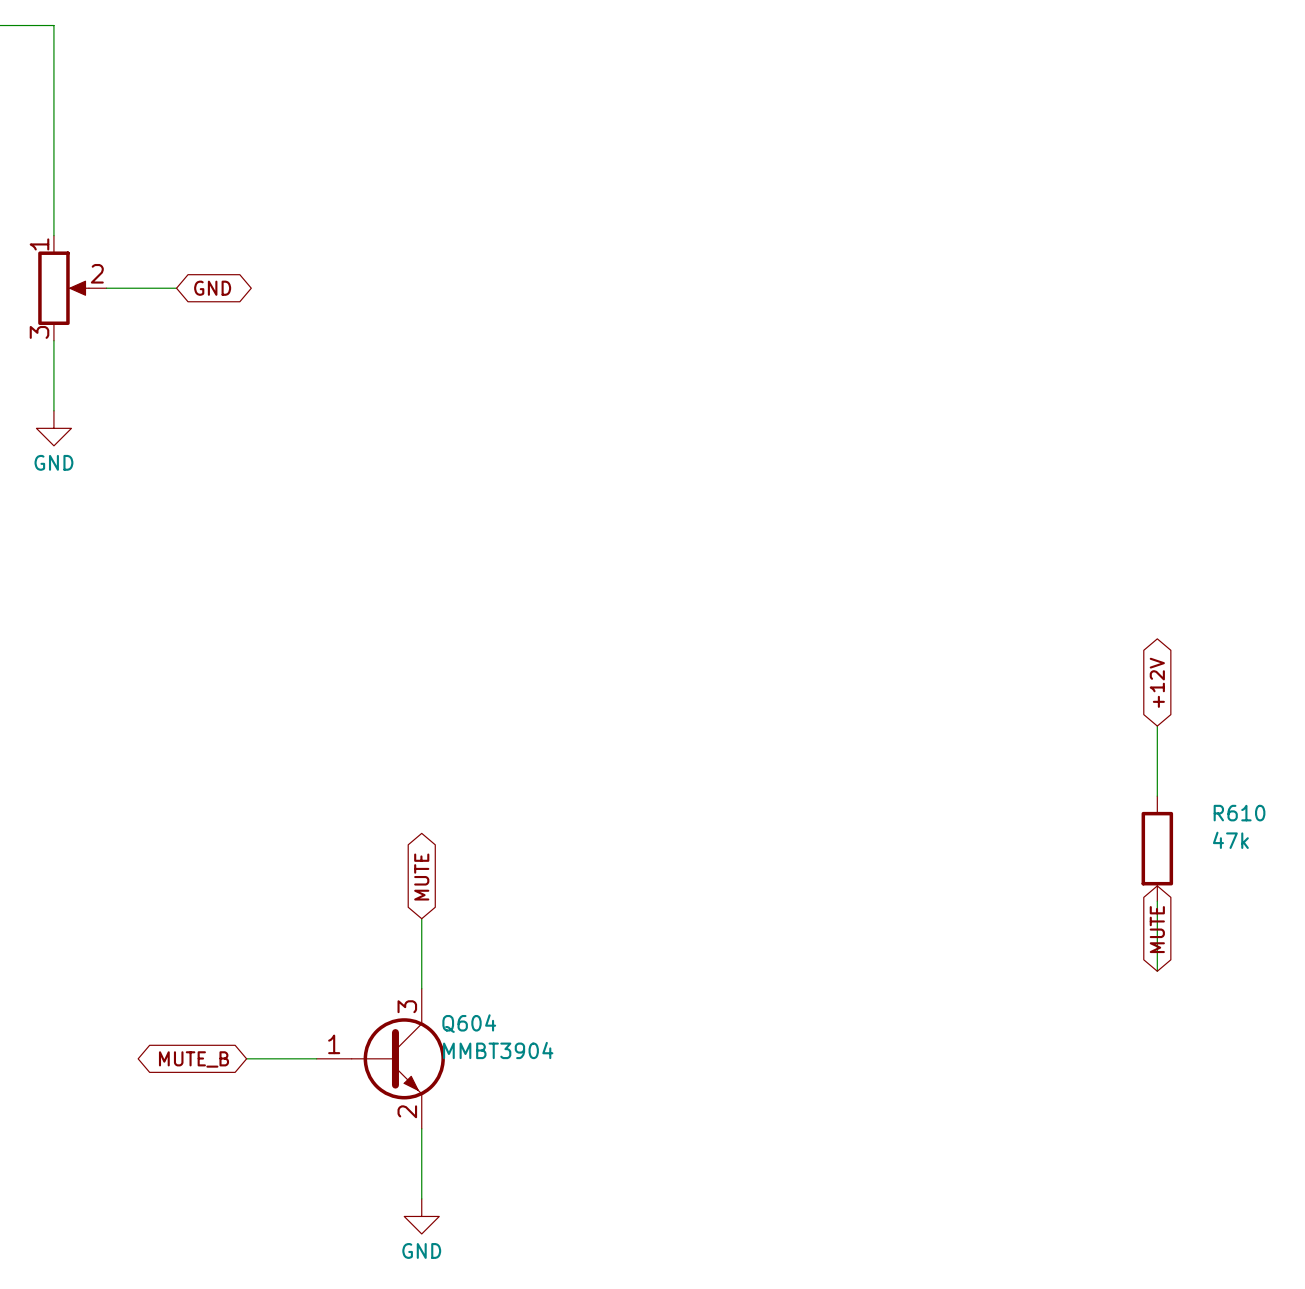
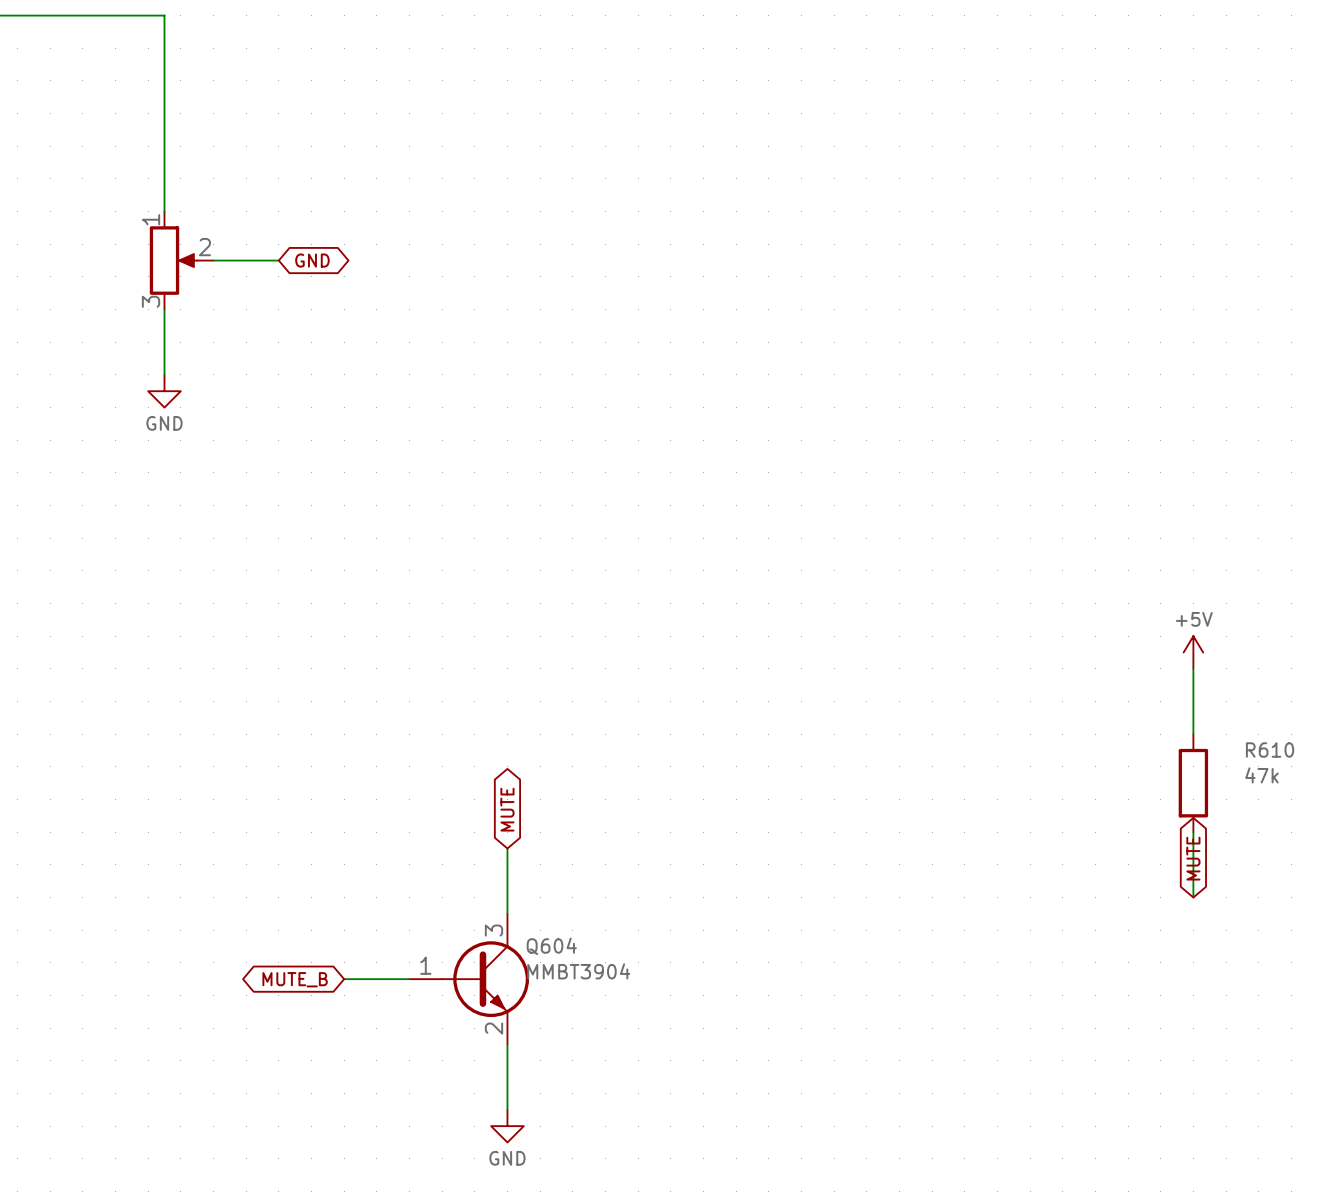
global label: +12V (1157, 682) -> none
power symbol: none -> +5V (1193, 652)

